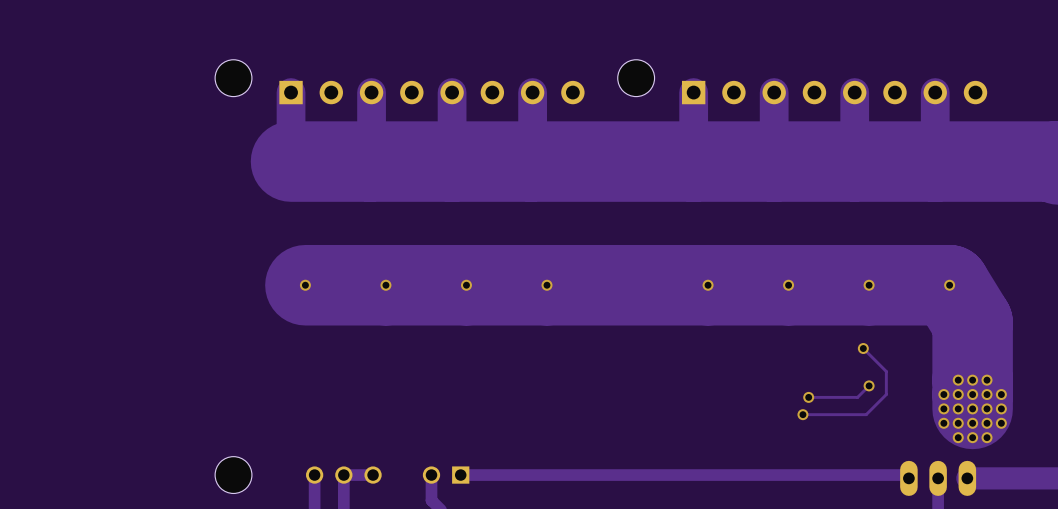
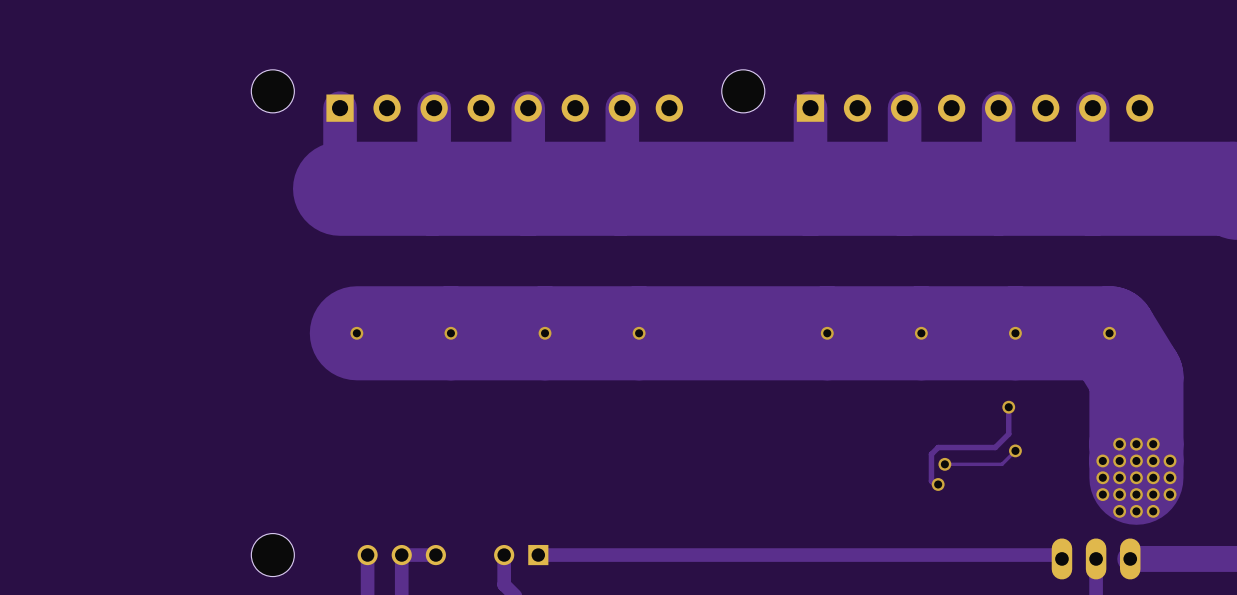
track: (863, 348) (886, 371) (886, 394) (866, 414) (802, 414) -> (1008, 407) (1008, 434) (995, 447) (938, 447) (931, 454) (931, 481) (934, 484)

